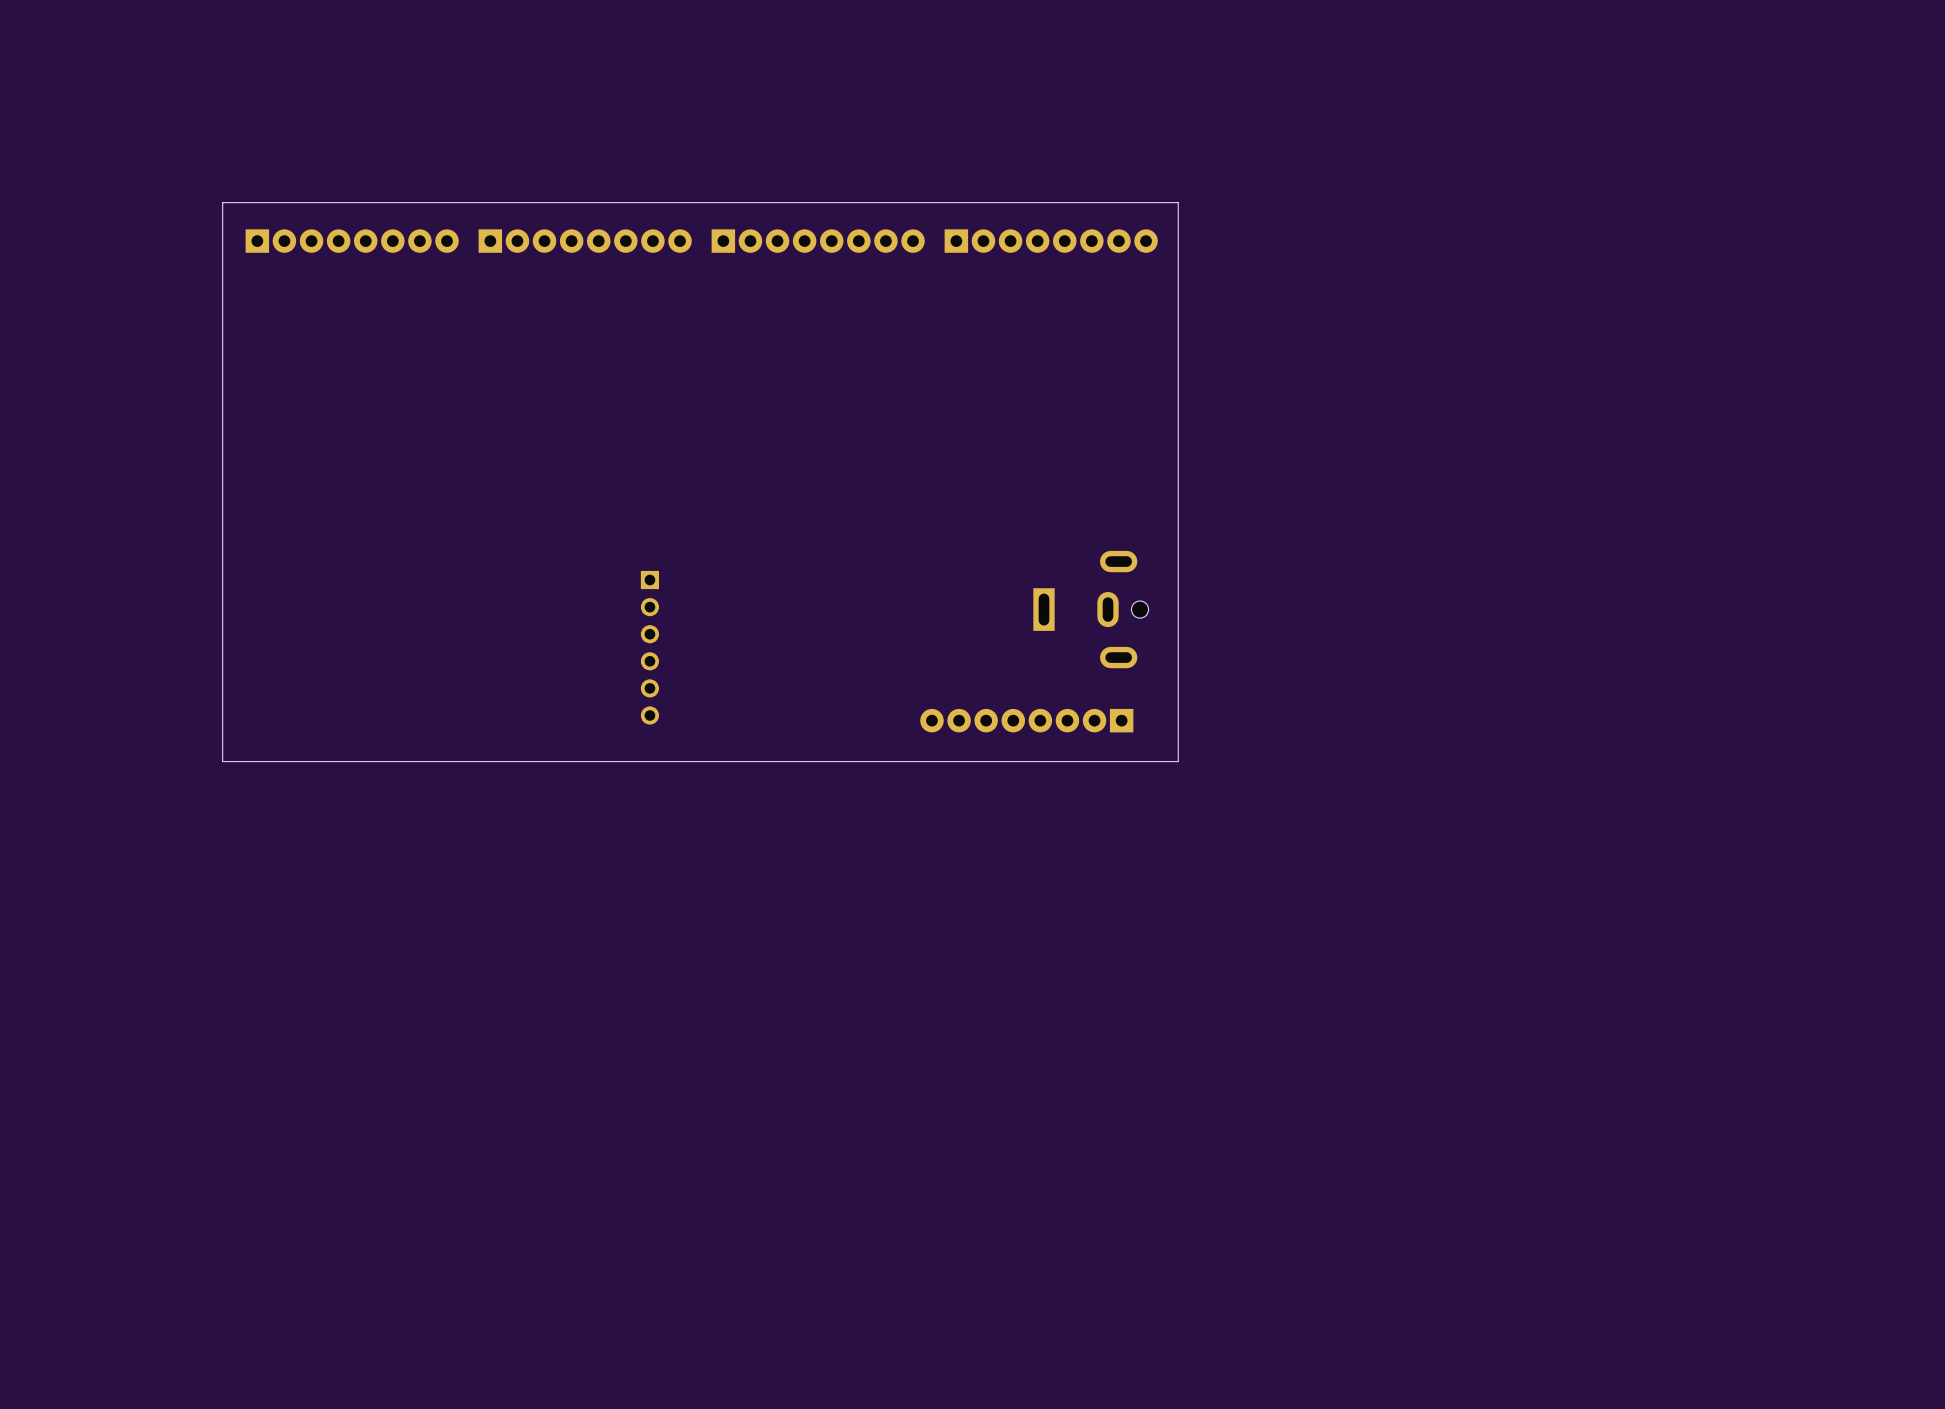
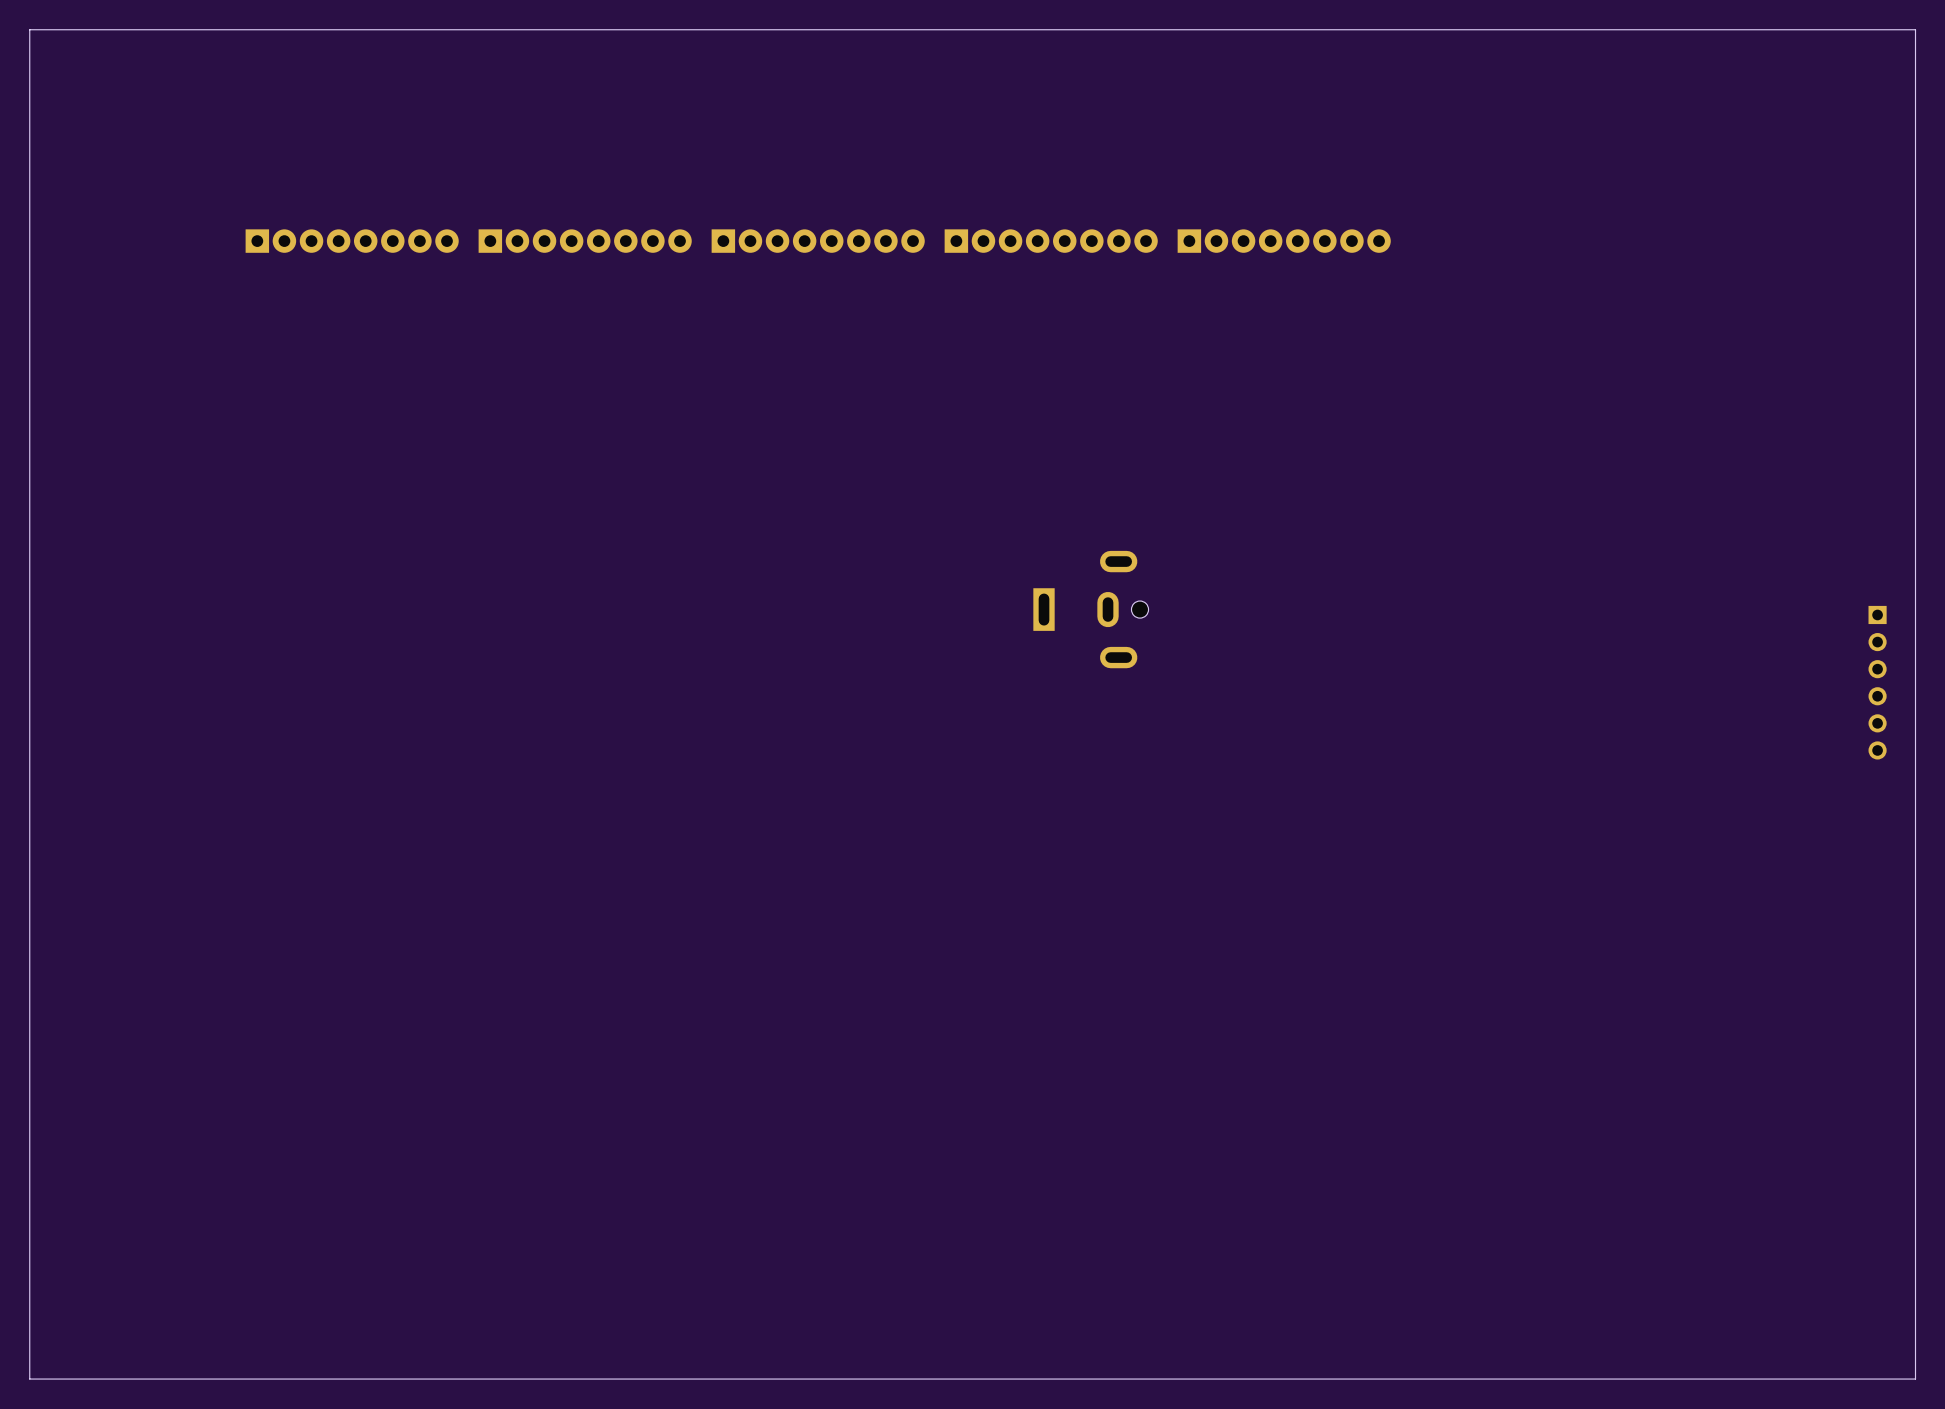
board edge: none -> (1915, 29) (29, 29) (29, 1379) (1915, 1379) (1915, 29)
board edge: (1178, 202) (222, 202) (222, 761) (1178, 761) (1178, 202) -> none
part: none -> (1284, 241)
part: (649, 647) -> none
part: none -> (1877, 682)
part: (1026, 720) -> none

